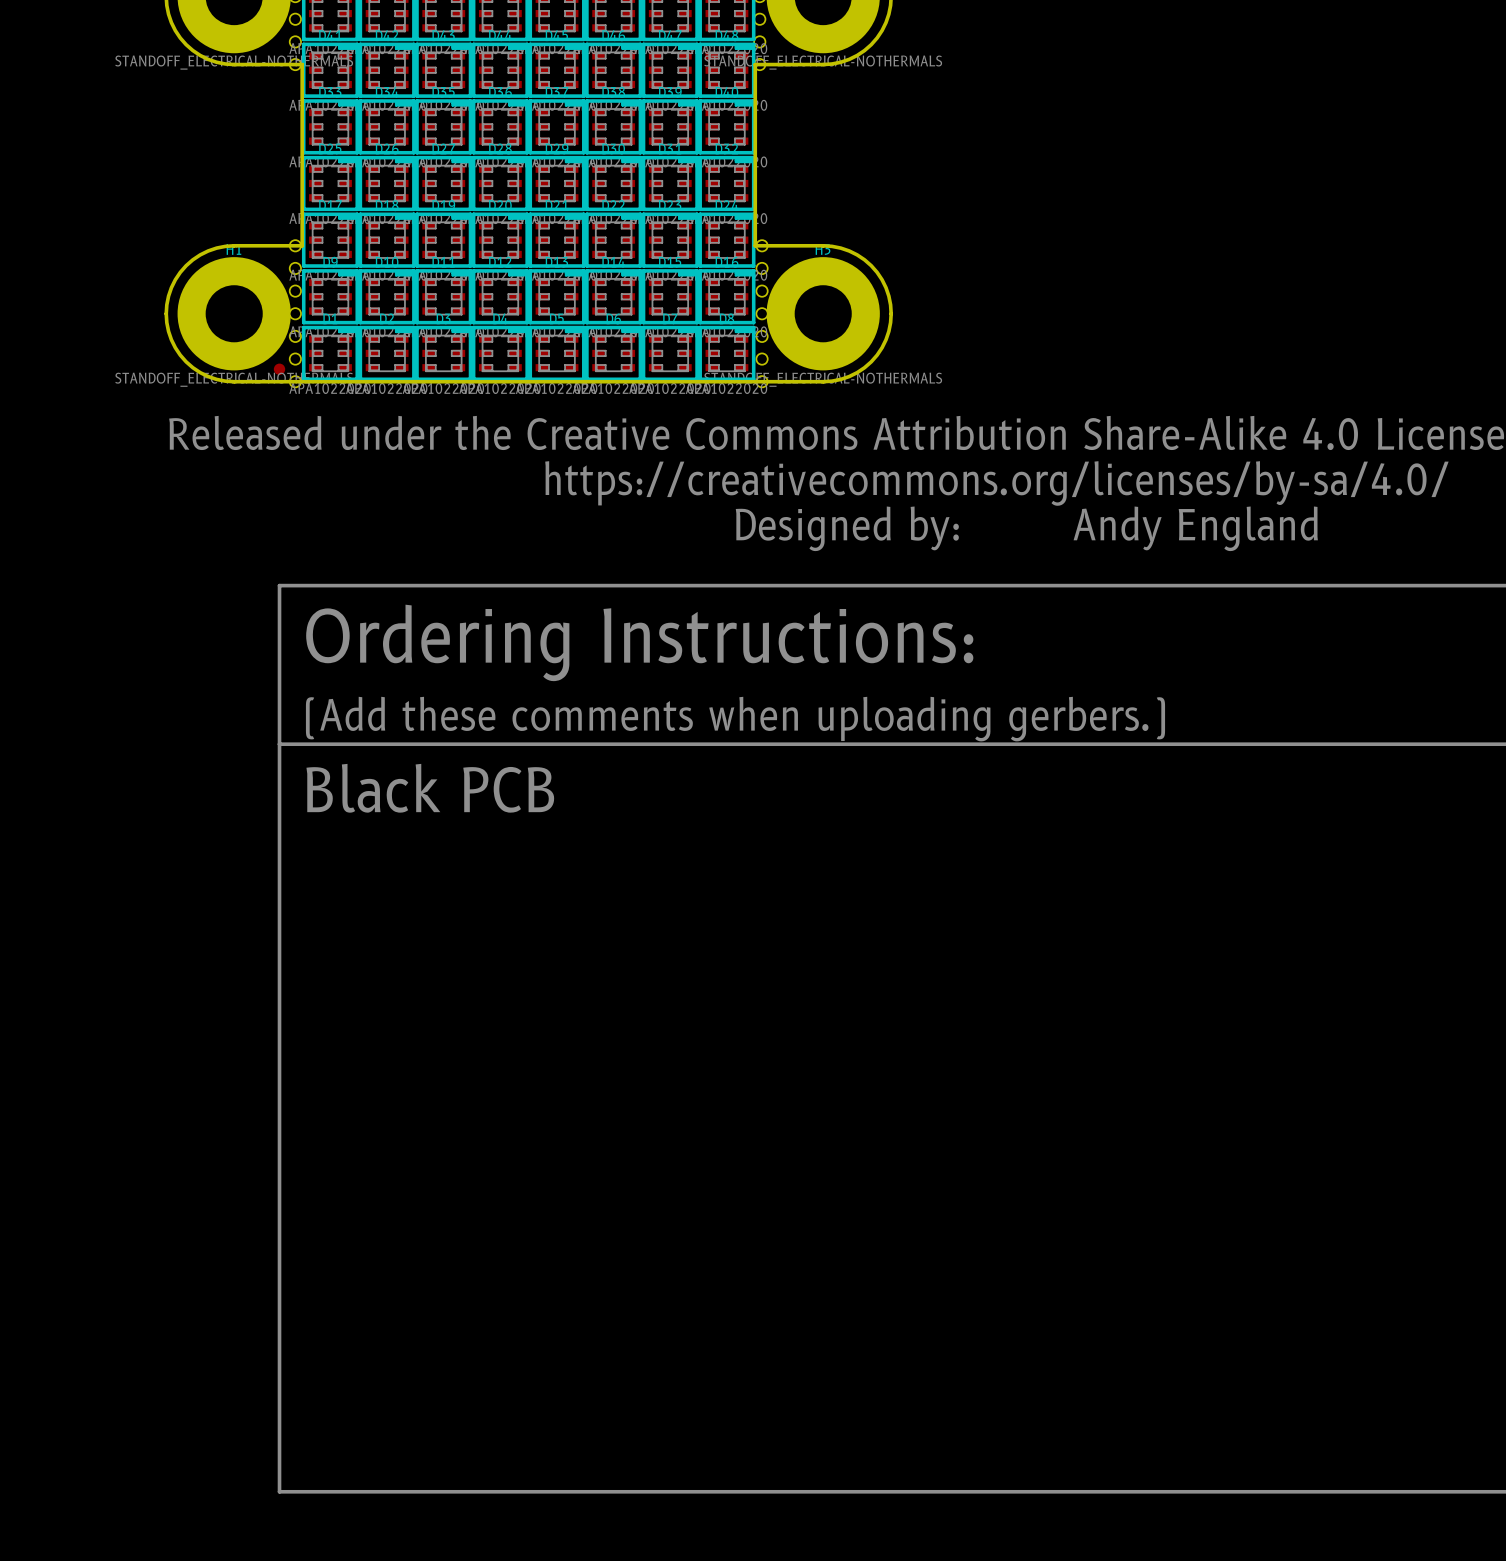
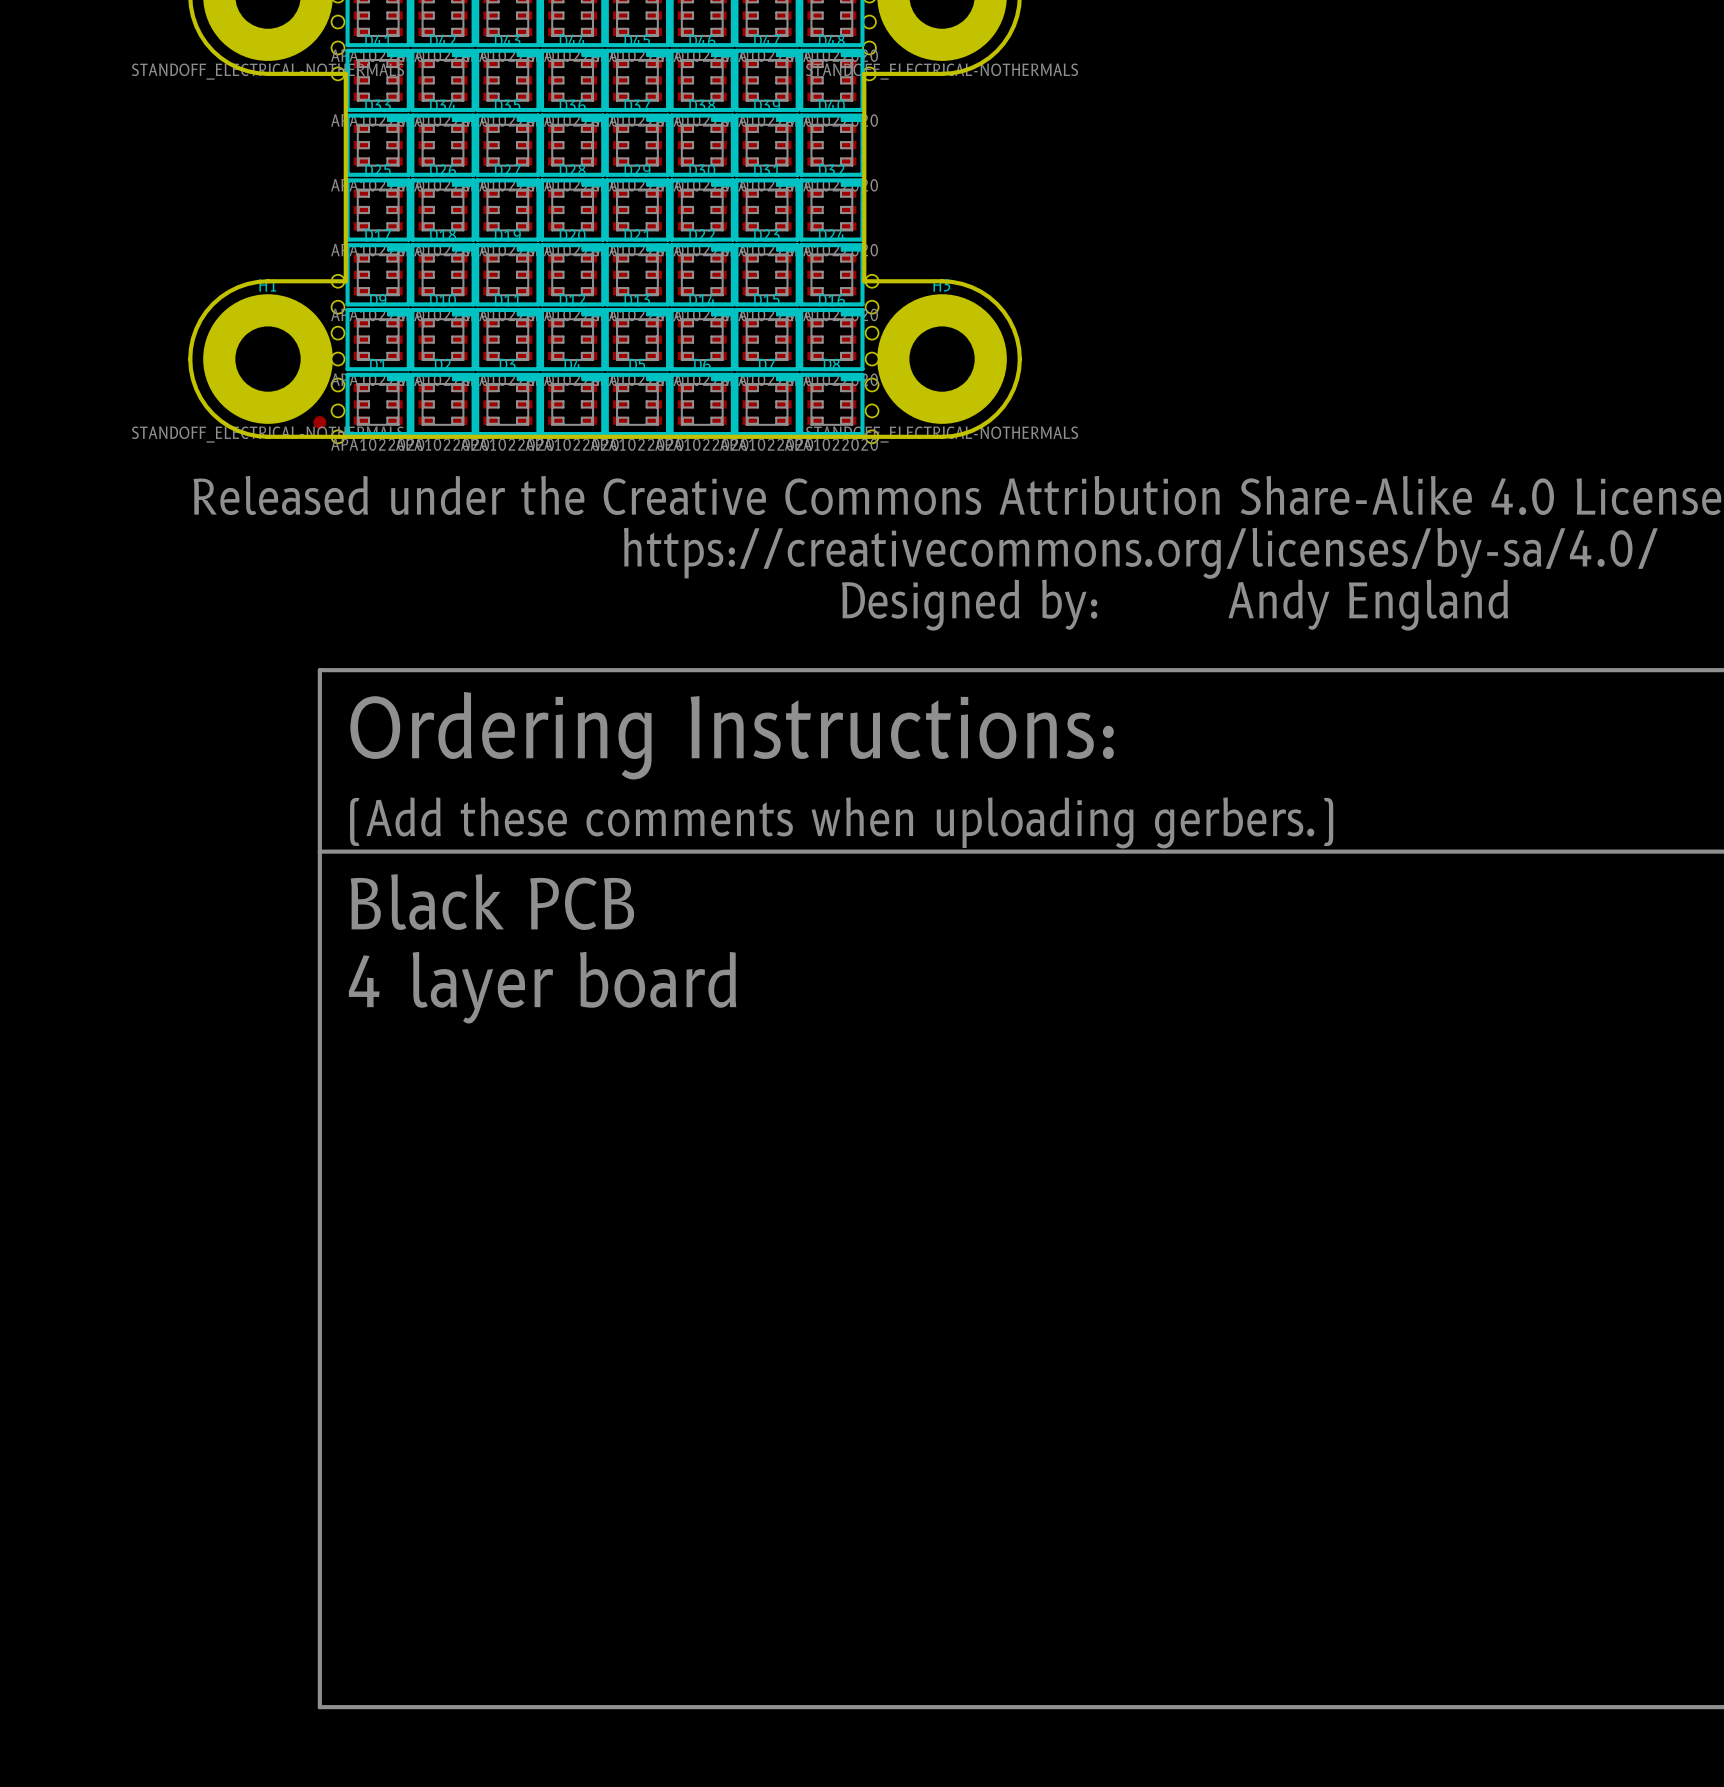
text: none -> 4 layer board (542, 987)

